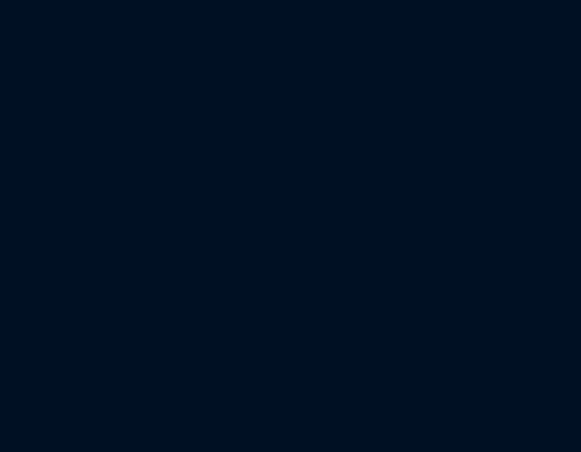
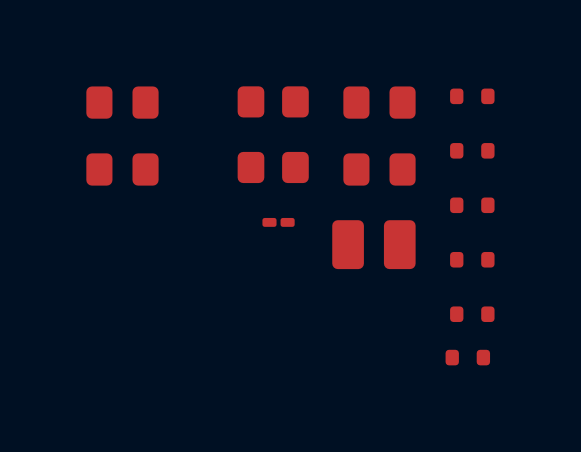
part: none -> (472, 96)
part: none -> (273, 101)
part: none -> (122, 102)
part: none -> (379, 102)
part: none -> (472, 150)
part: none -> (273, 167)
part: none -> (122, 169)
part: none -> (379, 169)
part: none -> (472, 205)
part: none -> (278, 222)
part: none -> (373, 244)
part: none -> (472, 259)
part: none -> (472, 314)
part: none -> (467, 357)

